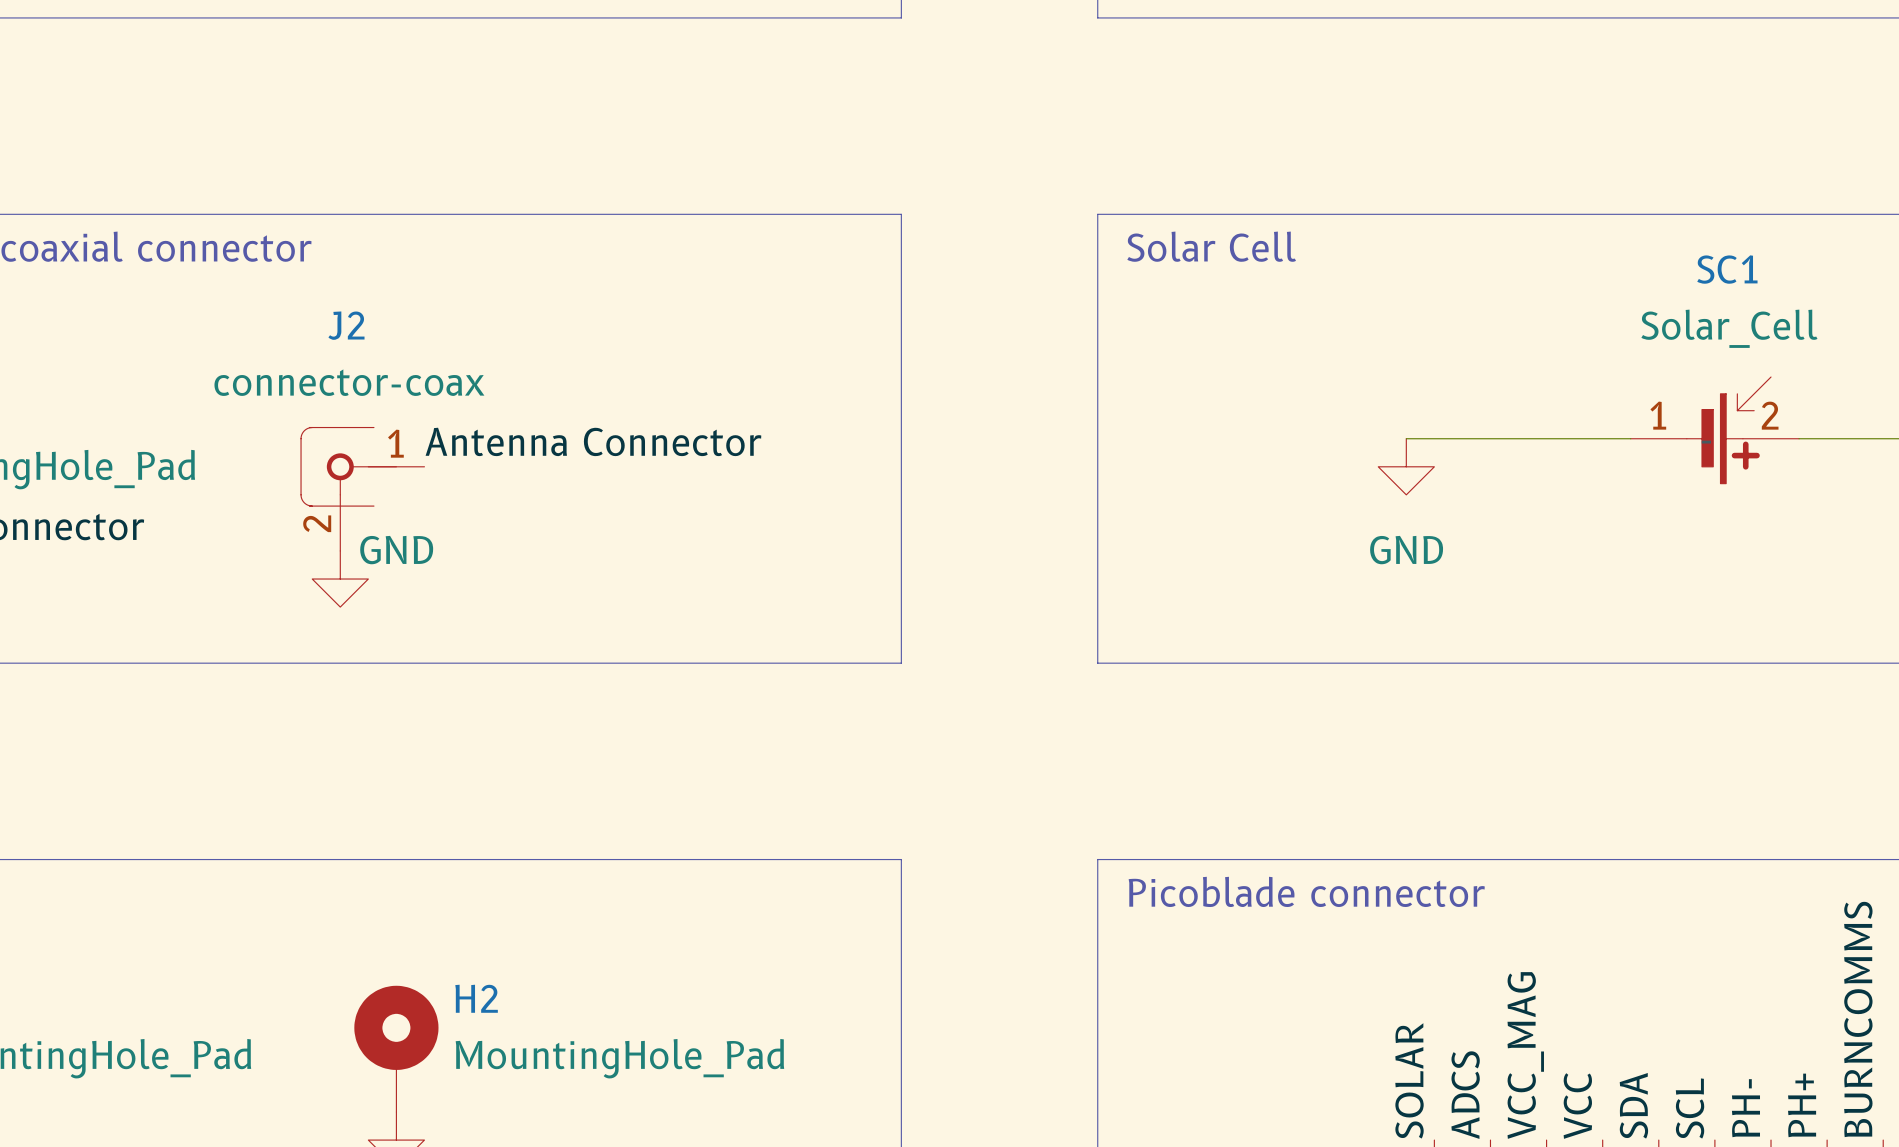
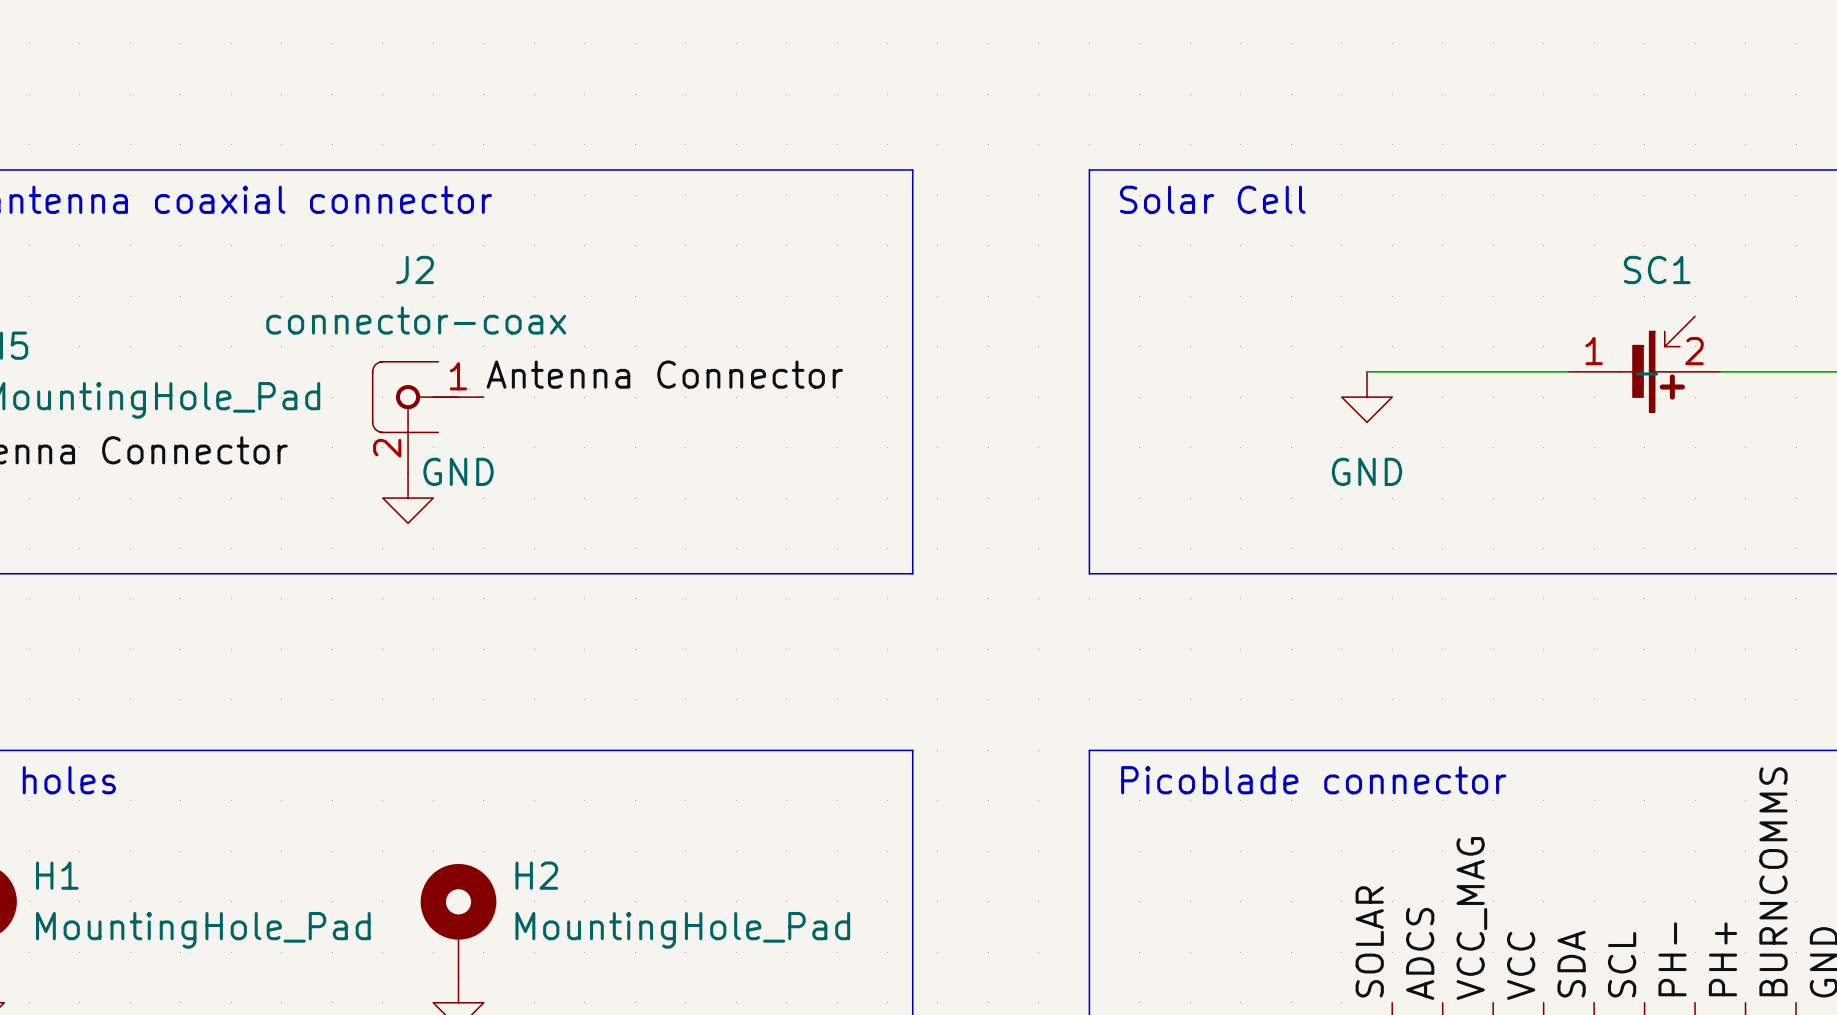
SC1 name position: SC1 (1727, 269) -> SC1 (1657, 269)
SC1 value: Solar_Cell (1729, 328) -> none

